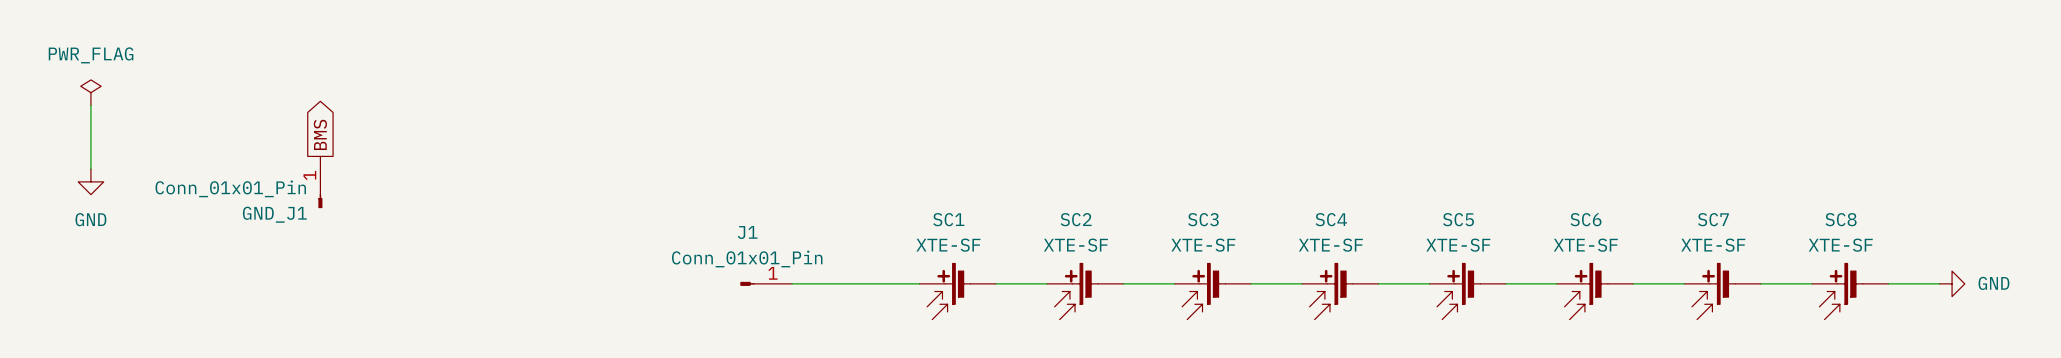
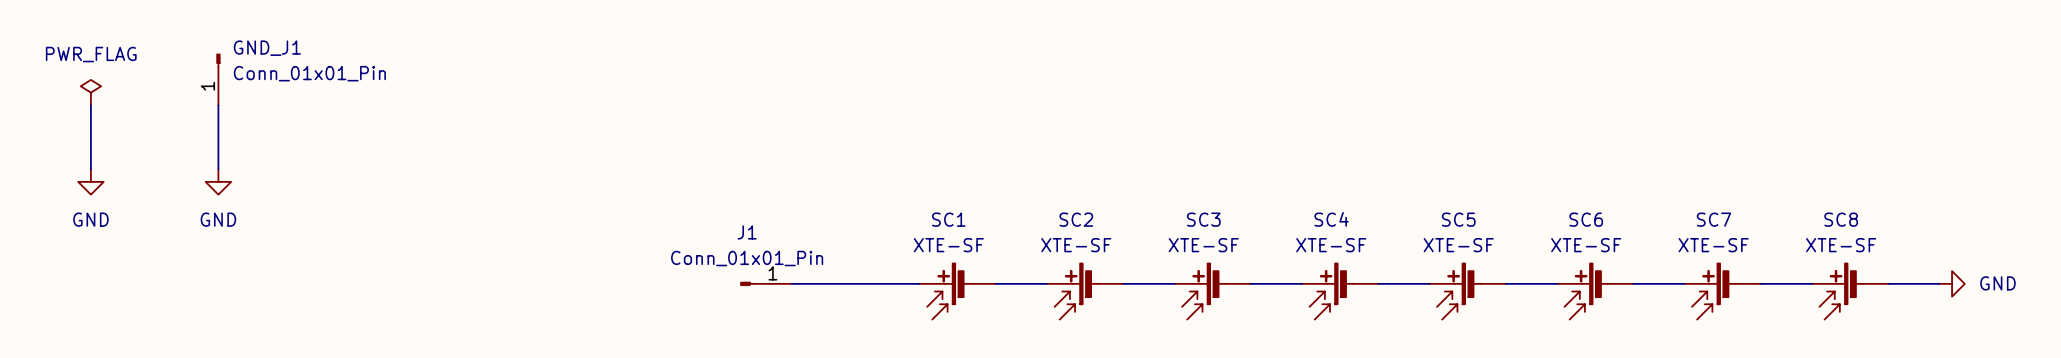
wire: none -> (218, 105) (218, 169)
global label: BMS (320, 134) -> none
power symbol: none -> GND (218, 181)
GND_J1 position: (320, 182) -> (218, 79)
GND_J1 rotation: 0° (320, 201) -> 180° (218, 60)

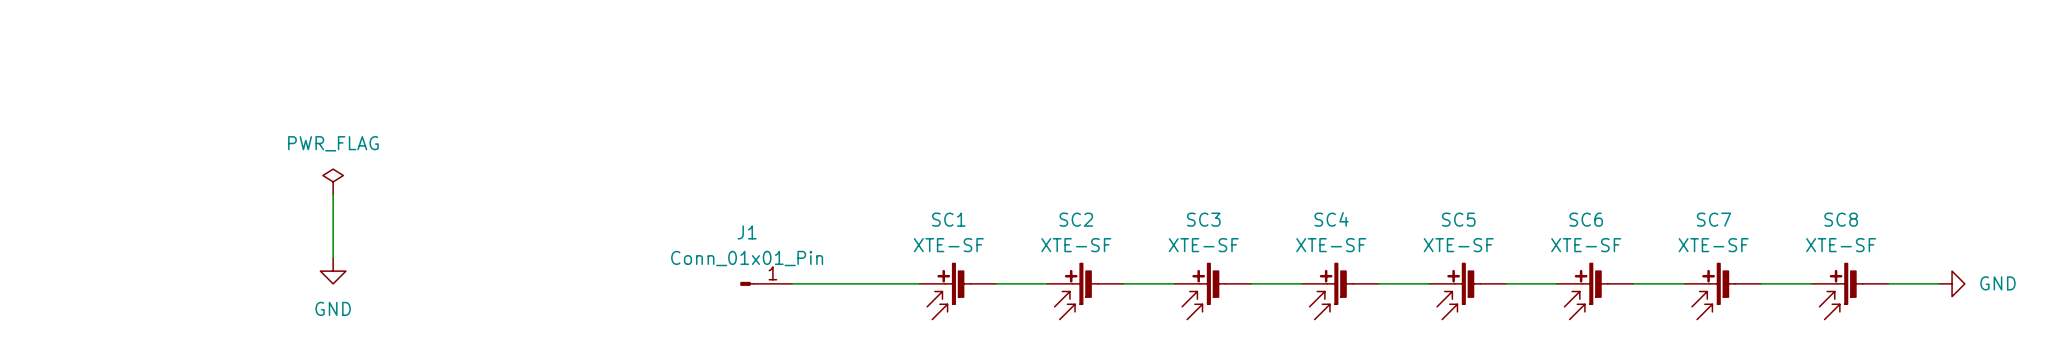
GND_J1: Conn_01x01_Pin (218, 79) -> none
power symbol: PWR_FLAG (90, 92) -> none
wire: (90, 105) (90, 169) -> none
wire: (218, 105) (218, 169) -> (333, 194) (333, 258)
power symbol: GND (90, 181) -> none
power symbol: GND (218, 181) -> none
power symbol: none -> PWR_FLAG (333, 181)
power symbol: none -> GND (333, 271)

